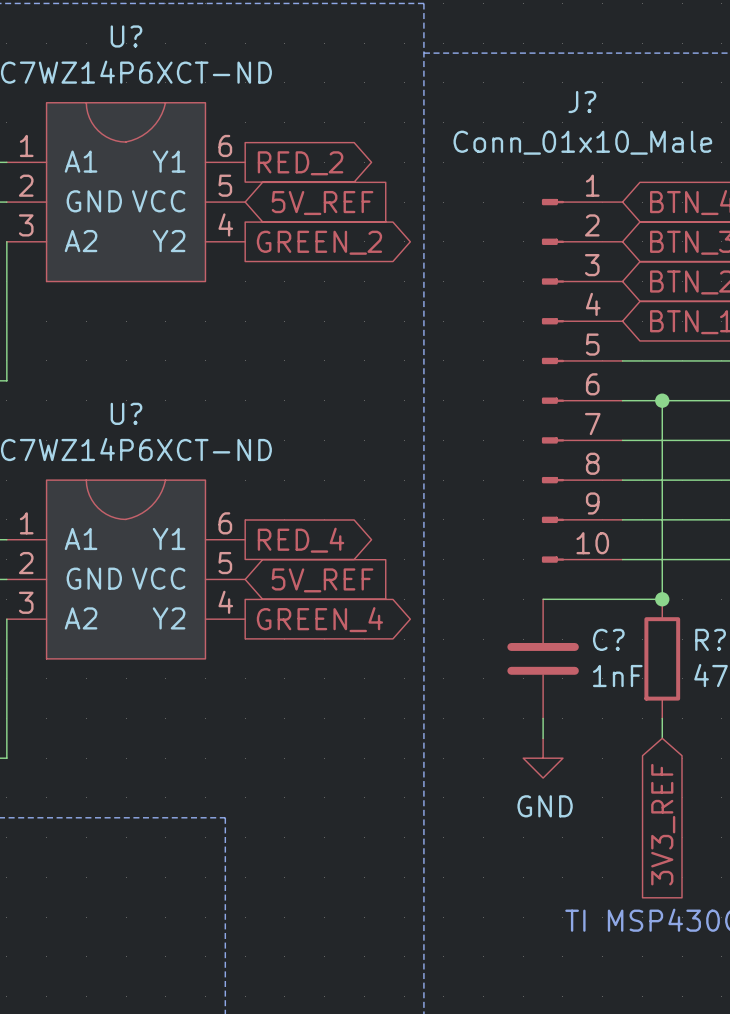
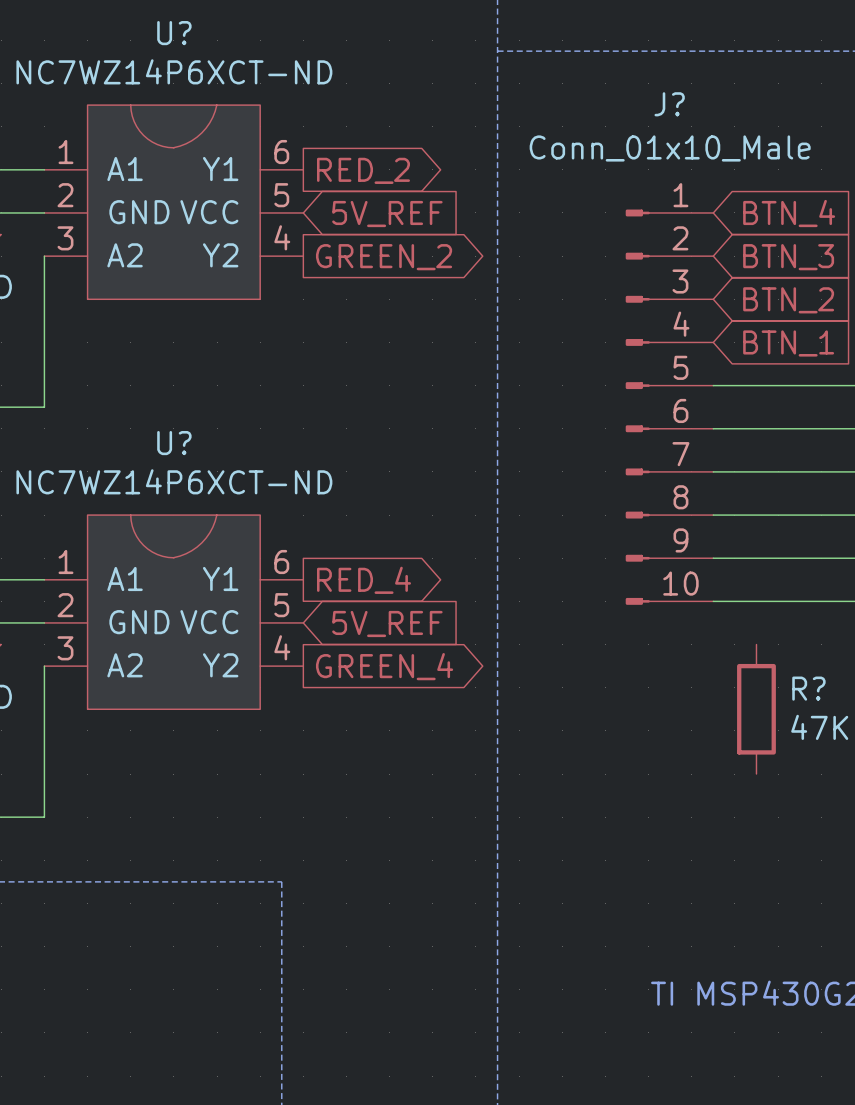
wire: (662, 400) (662, 599) (543, 599) -> none
junction: (662, 400) -> none
junction: (662, 599) -> none
C?: 1nF (543, 658) -> none
wire: (543, 718) (543, 738) -> none
wire: (662, 718) (662, 738) -> none
power symbol: GND (543, 758) -> none
global label: 3V3_REF (663, 824) -> none

